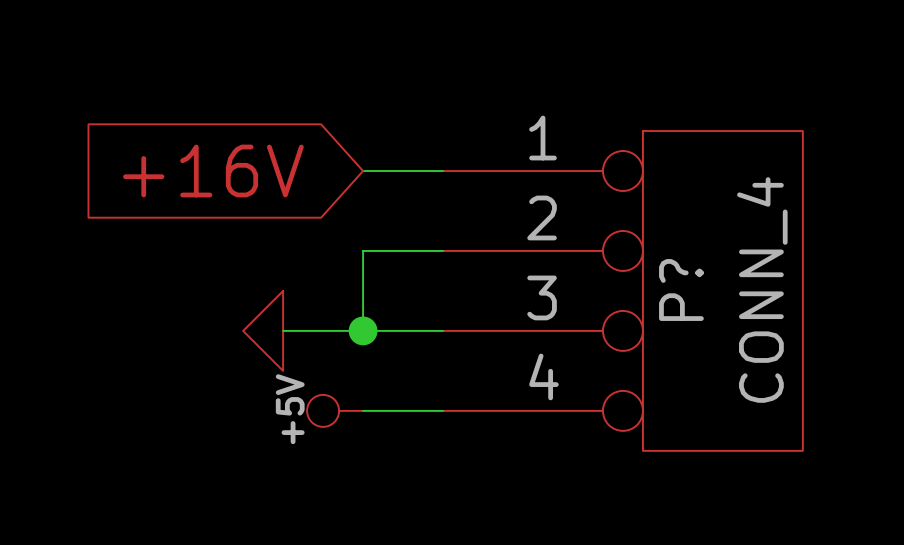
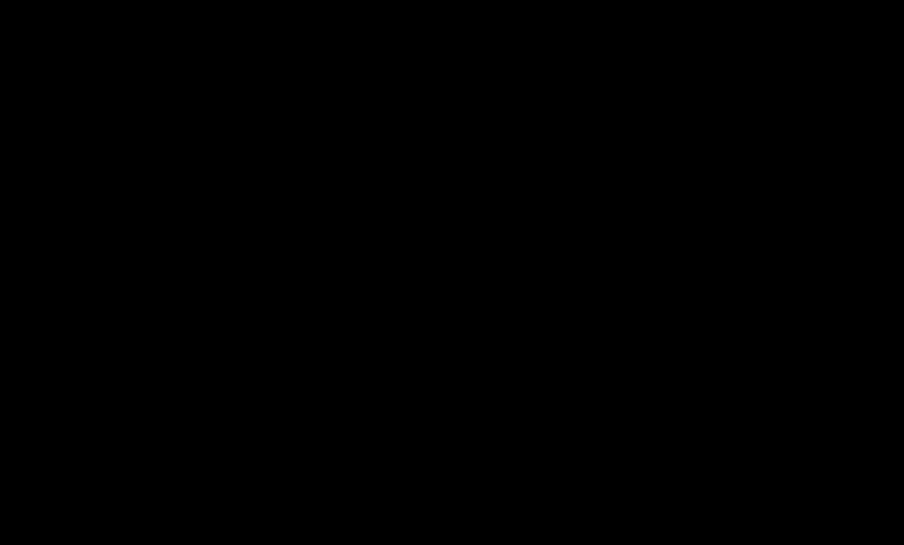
global label: +16V (213, 171) -> none
wire: (363, 171) (443, 171) -> none
wire: (443, 250) (363, 250) (363, 330) -> none
P?: CONN_4 (622, 290) -> none
power symbol: (263, 330) -> none
wire: (283, 330) (443, 330) -> none
junction: (363, 330) -> none
power symbol: +5V (335, 410) -> none
wire: (363, 410) (443, 410) -> none

